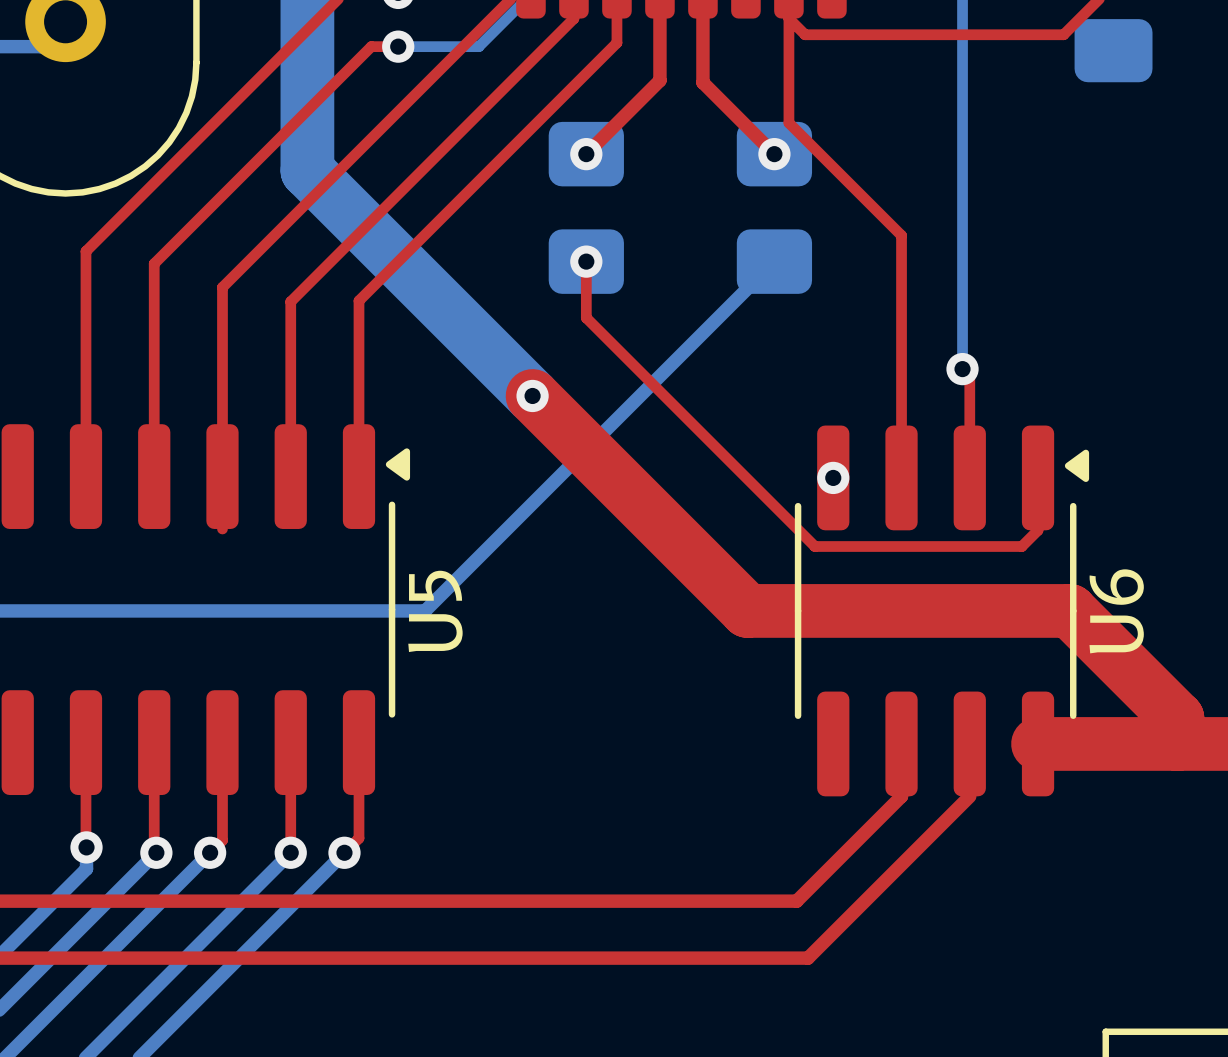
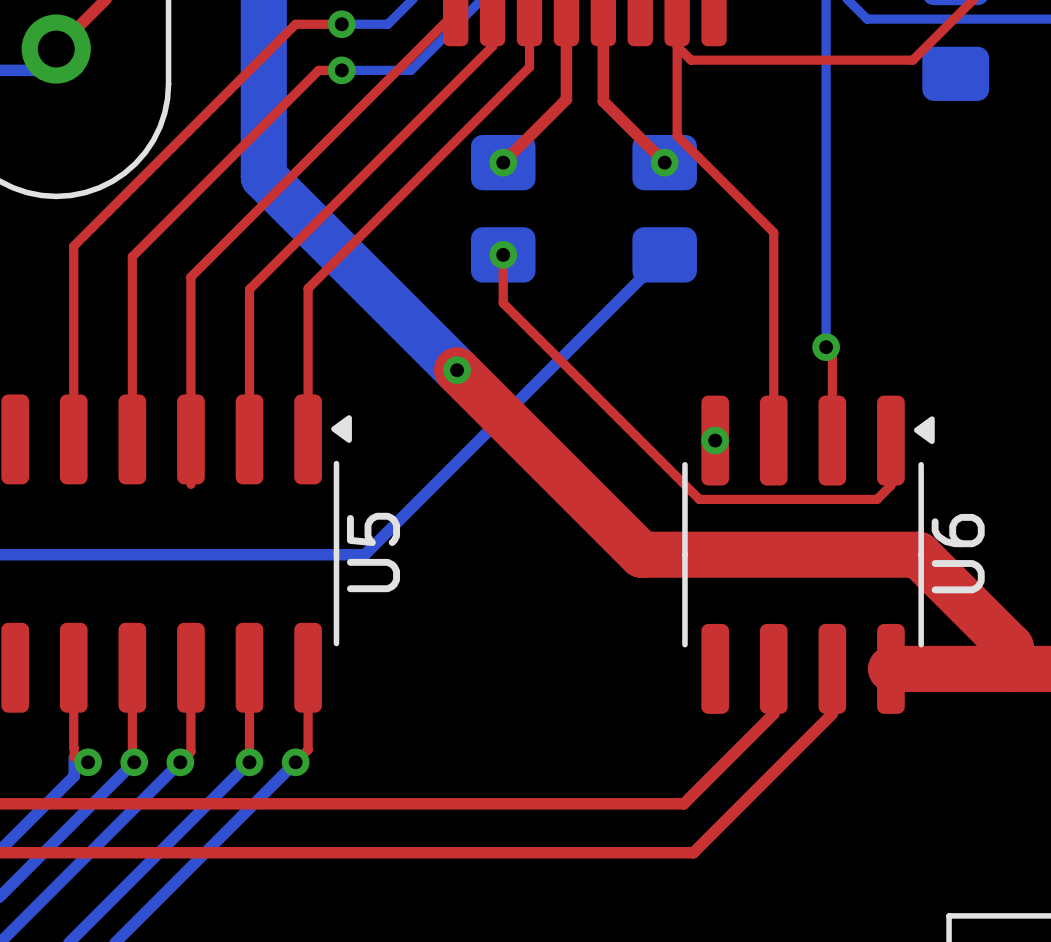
via position: (86, 847) -> (88, 762)

